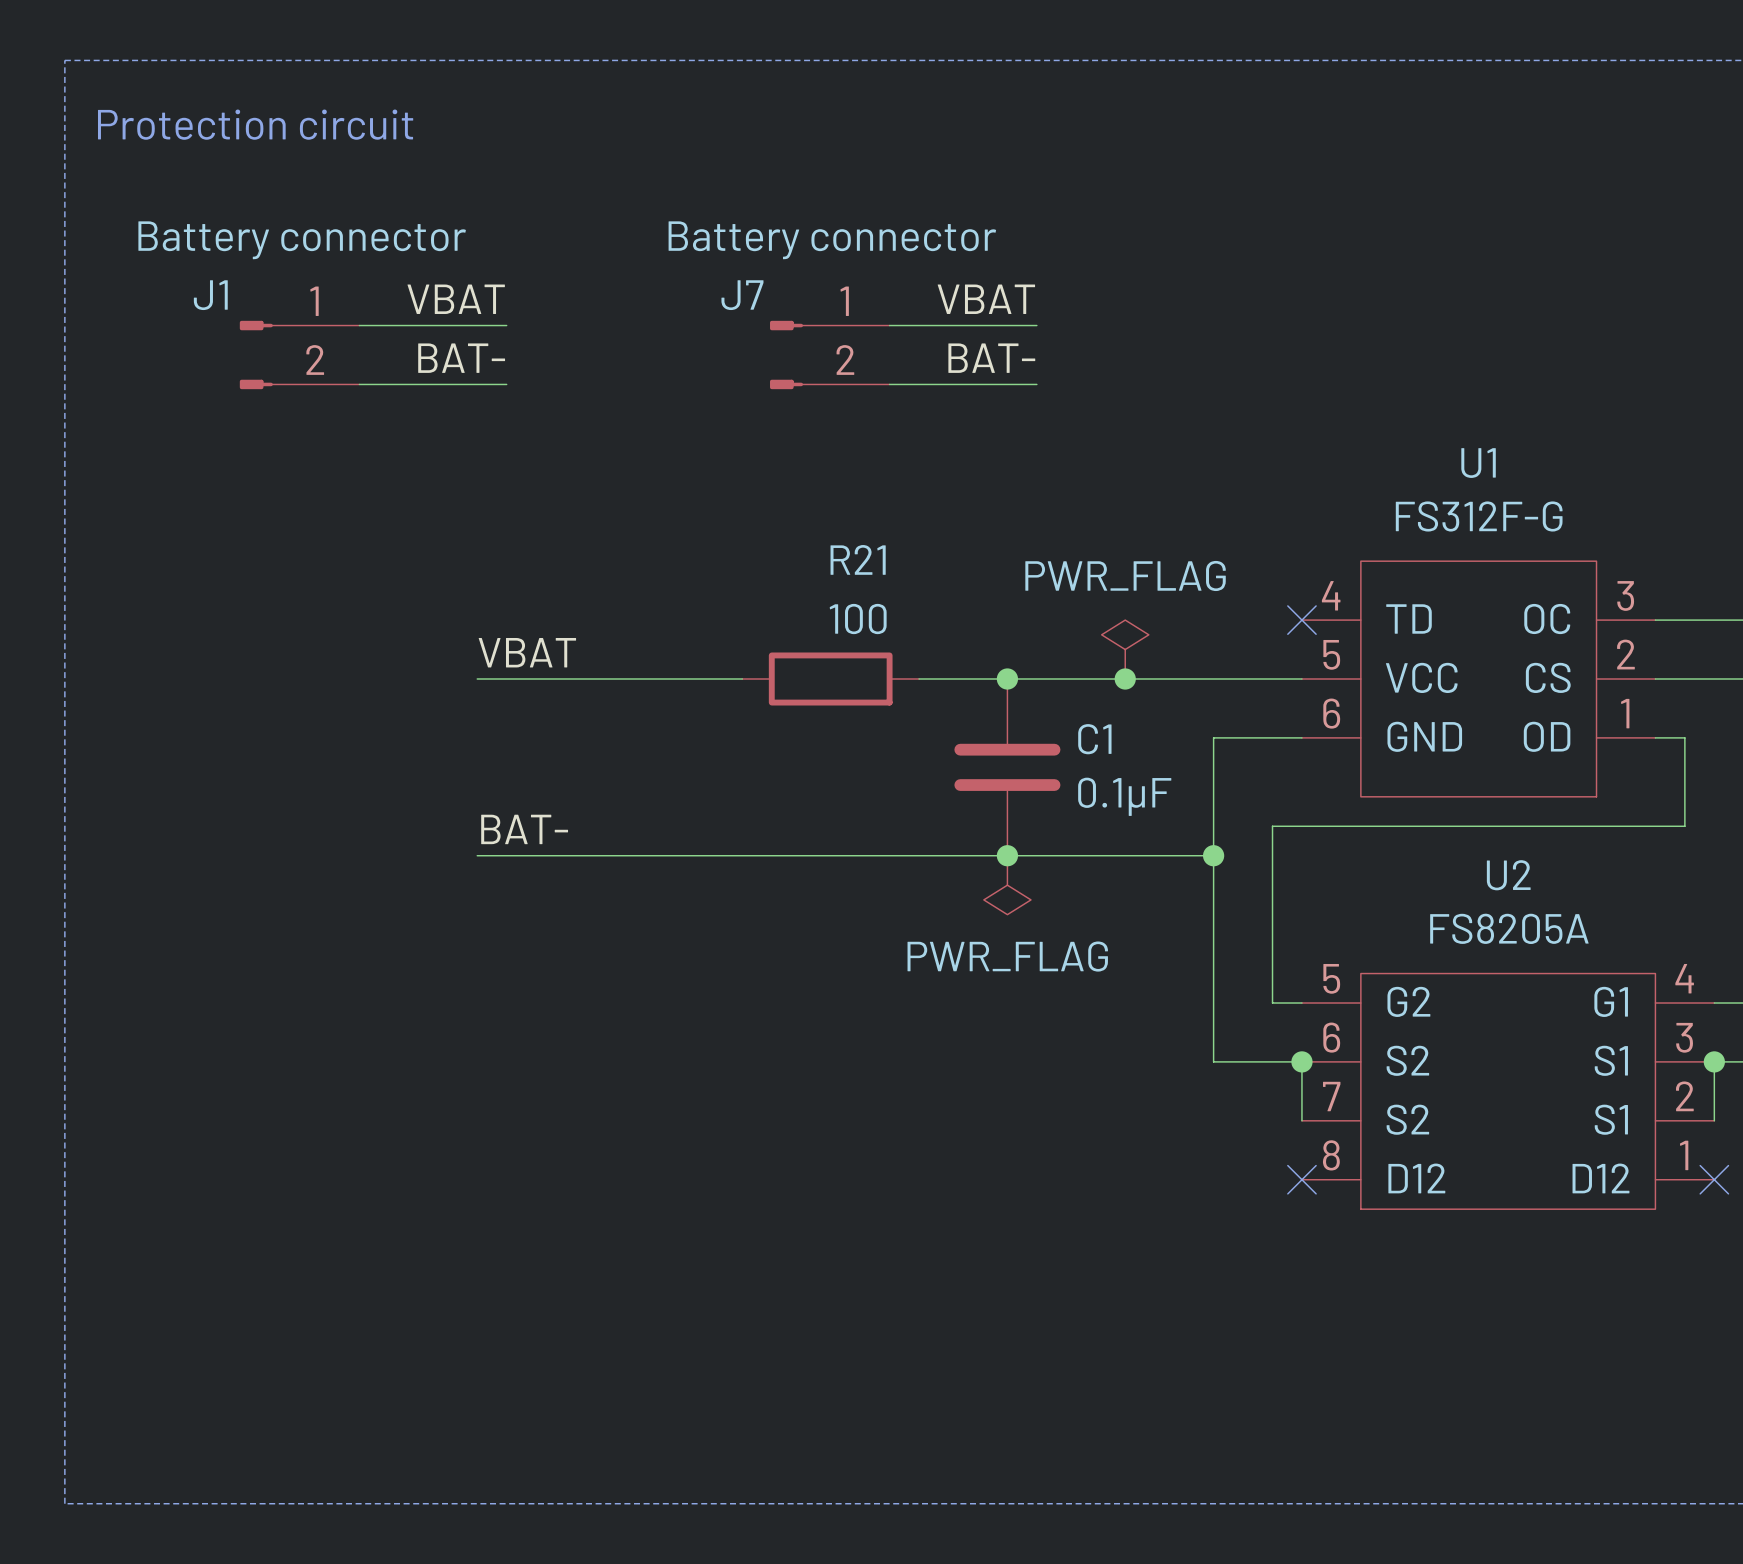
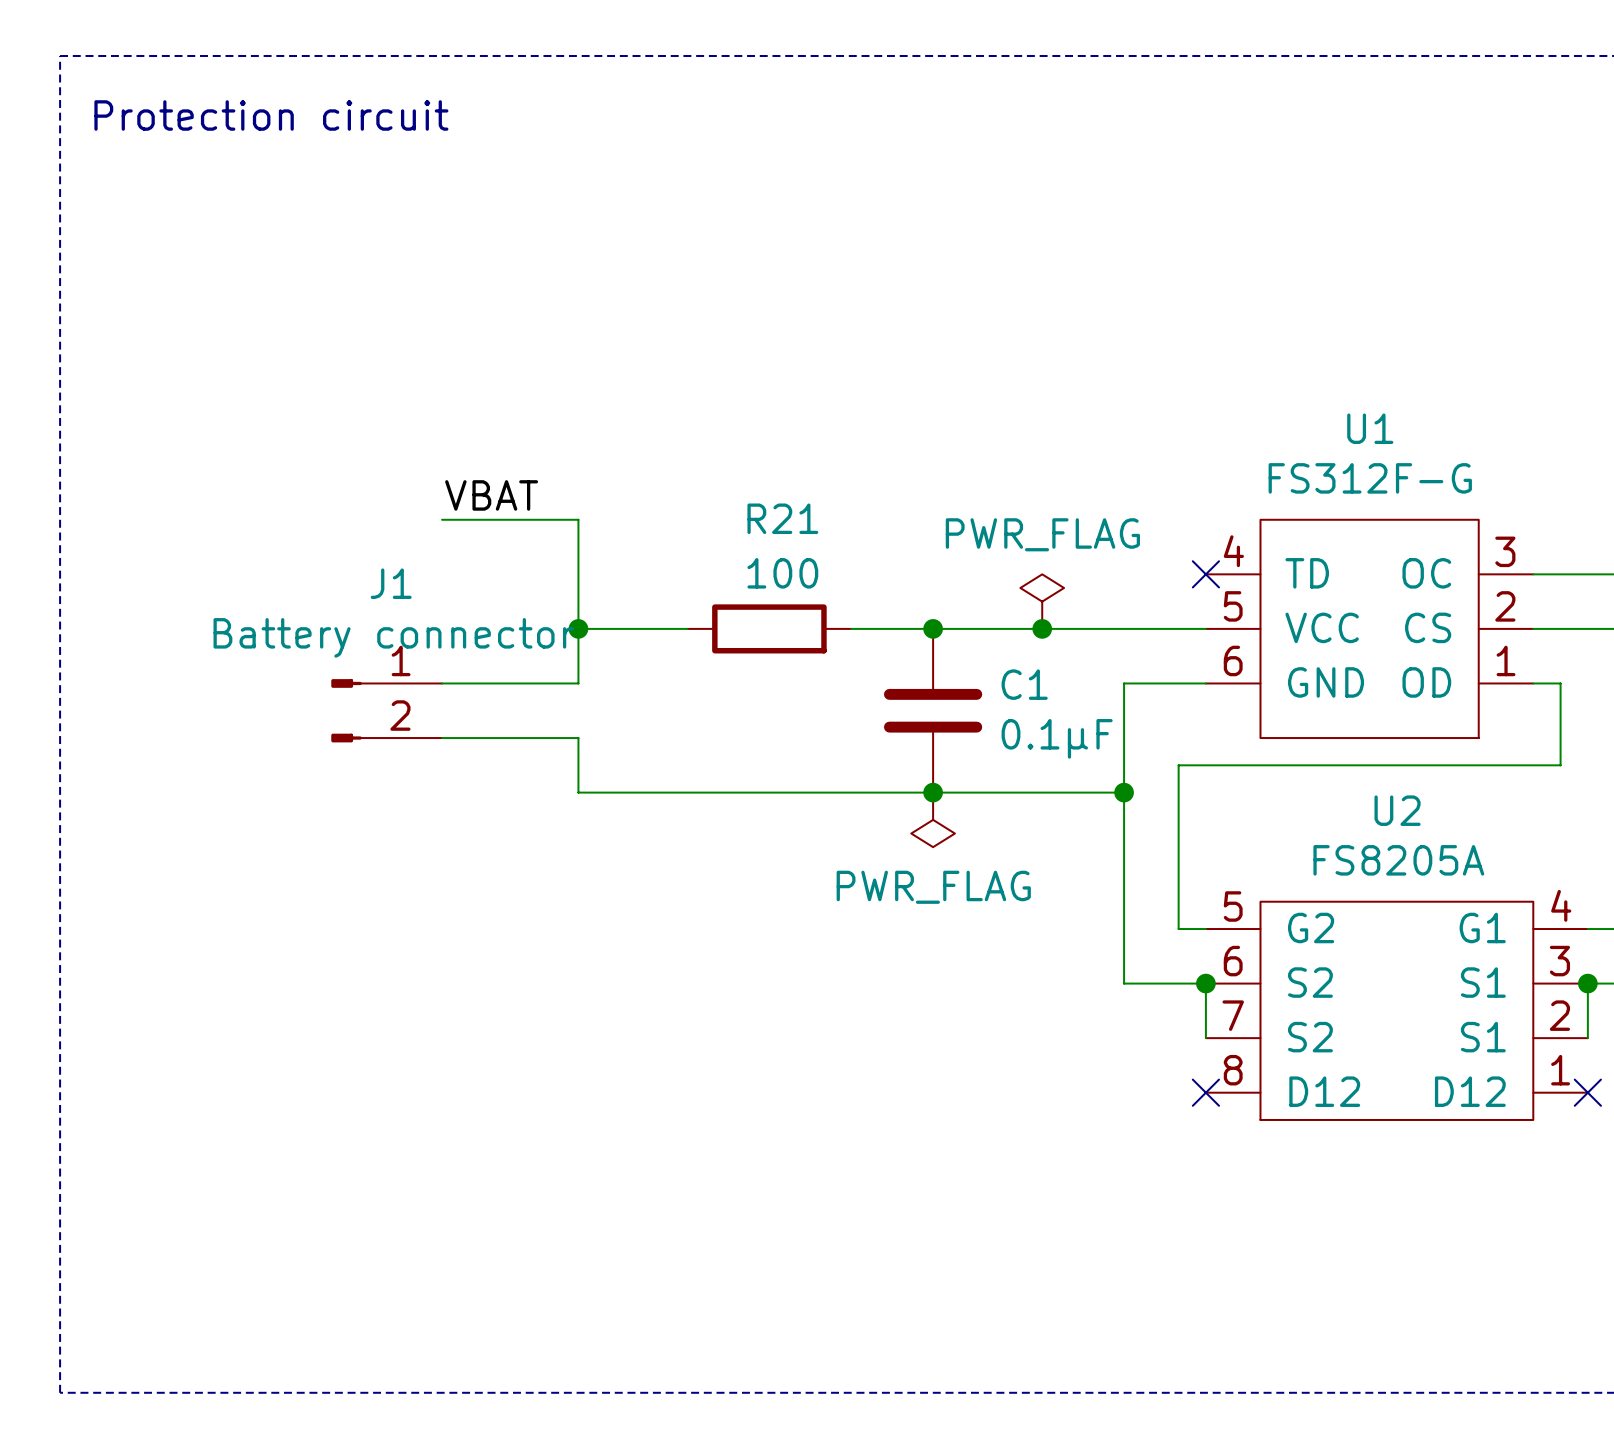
J1 value position: Battery connector (302, 240) -> Battery connector (393, 637)
J1 name position: J1 (210, 295) -> J1 (391, 583)
label: VBAT (456, 299) -> none
label: VBAT (986, 299) -> none
wire: (359, 325) (506, 325) -> none
wire: (889, 325) (1036, 325) -> none
J1 position: (299, 354) -> (386, 710)
J7: Battery connector (829, 354) -> none
label: BAT- (461, 358) -> none
label: BAT- (991, 358) -> none
wire: (359, 384) (506, 384) -> none
wire: (889, 384) (1036, 384) -> none
wire: none -> (442, 519) (578, 519) (578, 683) (442, 683)
label position: VBAT (527, 652) -> VBAT (491, 495)
wire: (477, 679) (624, 679) -> none
junction: none -> (578, 628)
label: BAT- (524, 829) -> none
wire: (477, 855) (624, 855) -> (442, 738) (578, 738) (578, 792)

